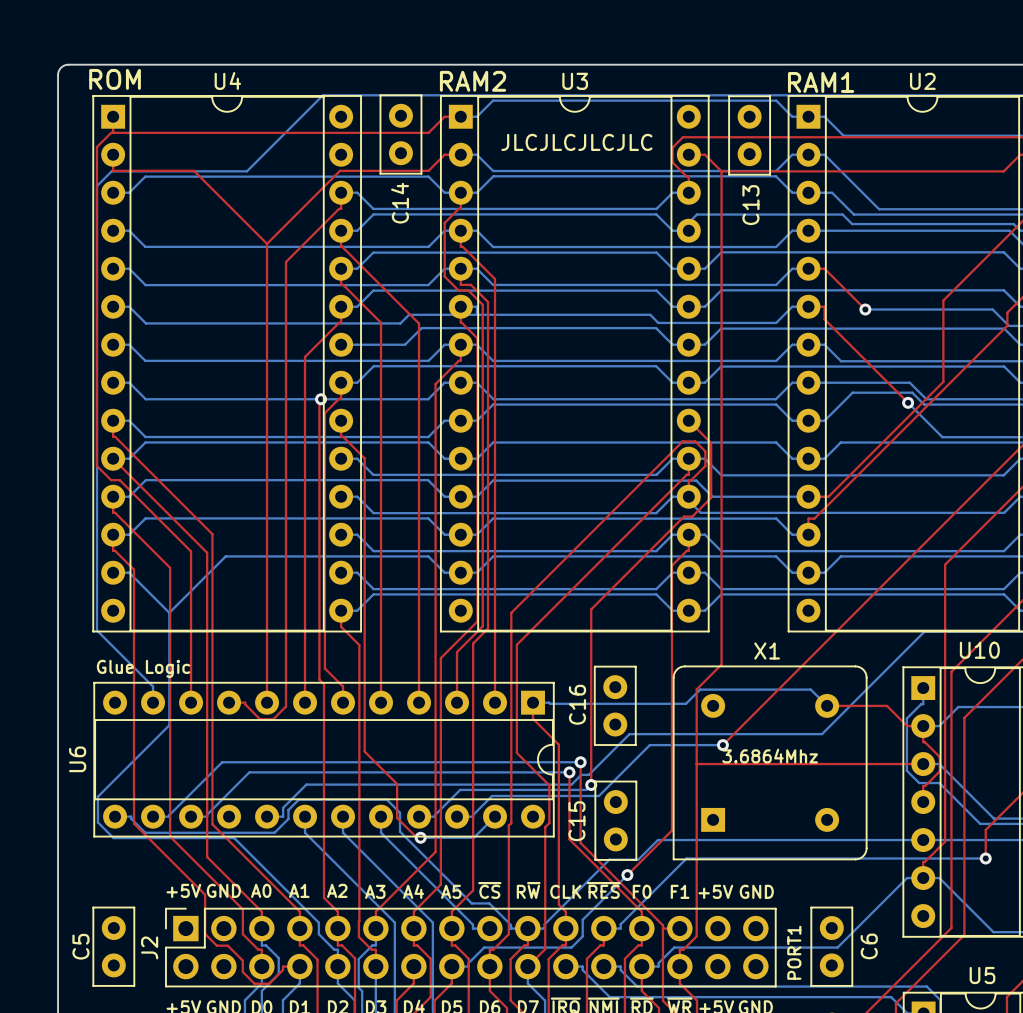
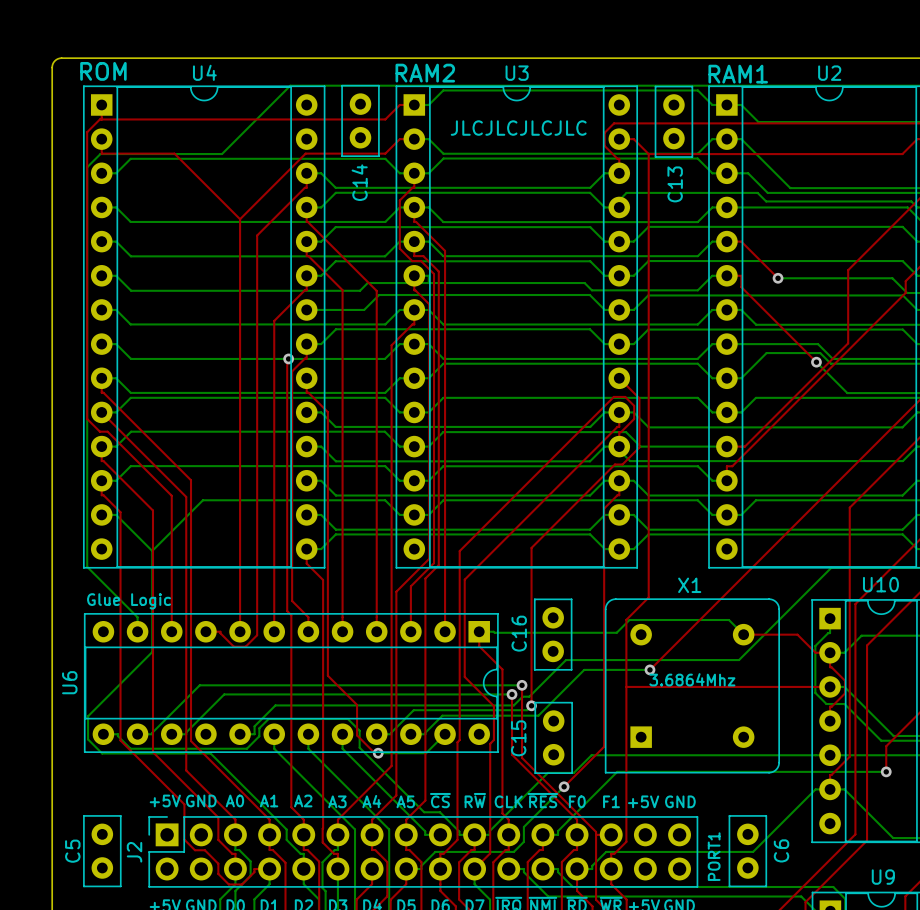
U5 name: U5 (982, 975) -> U9 (883, 877)

